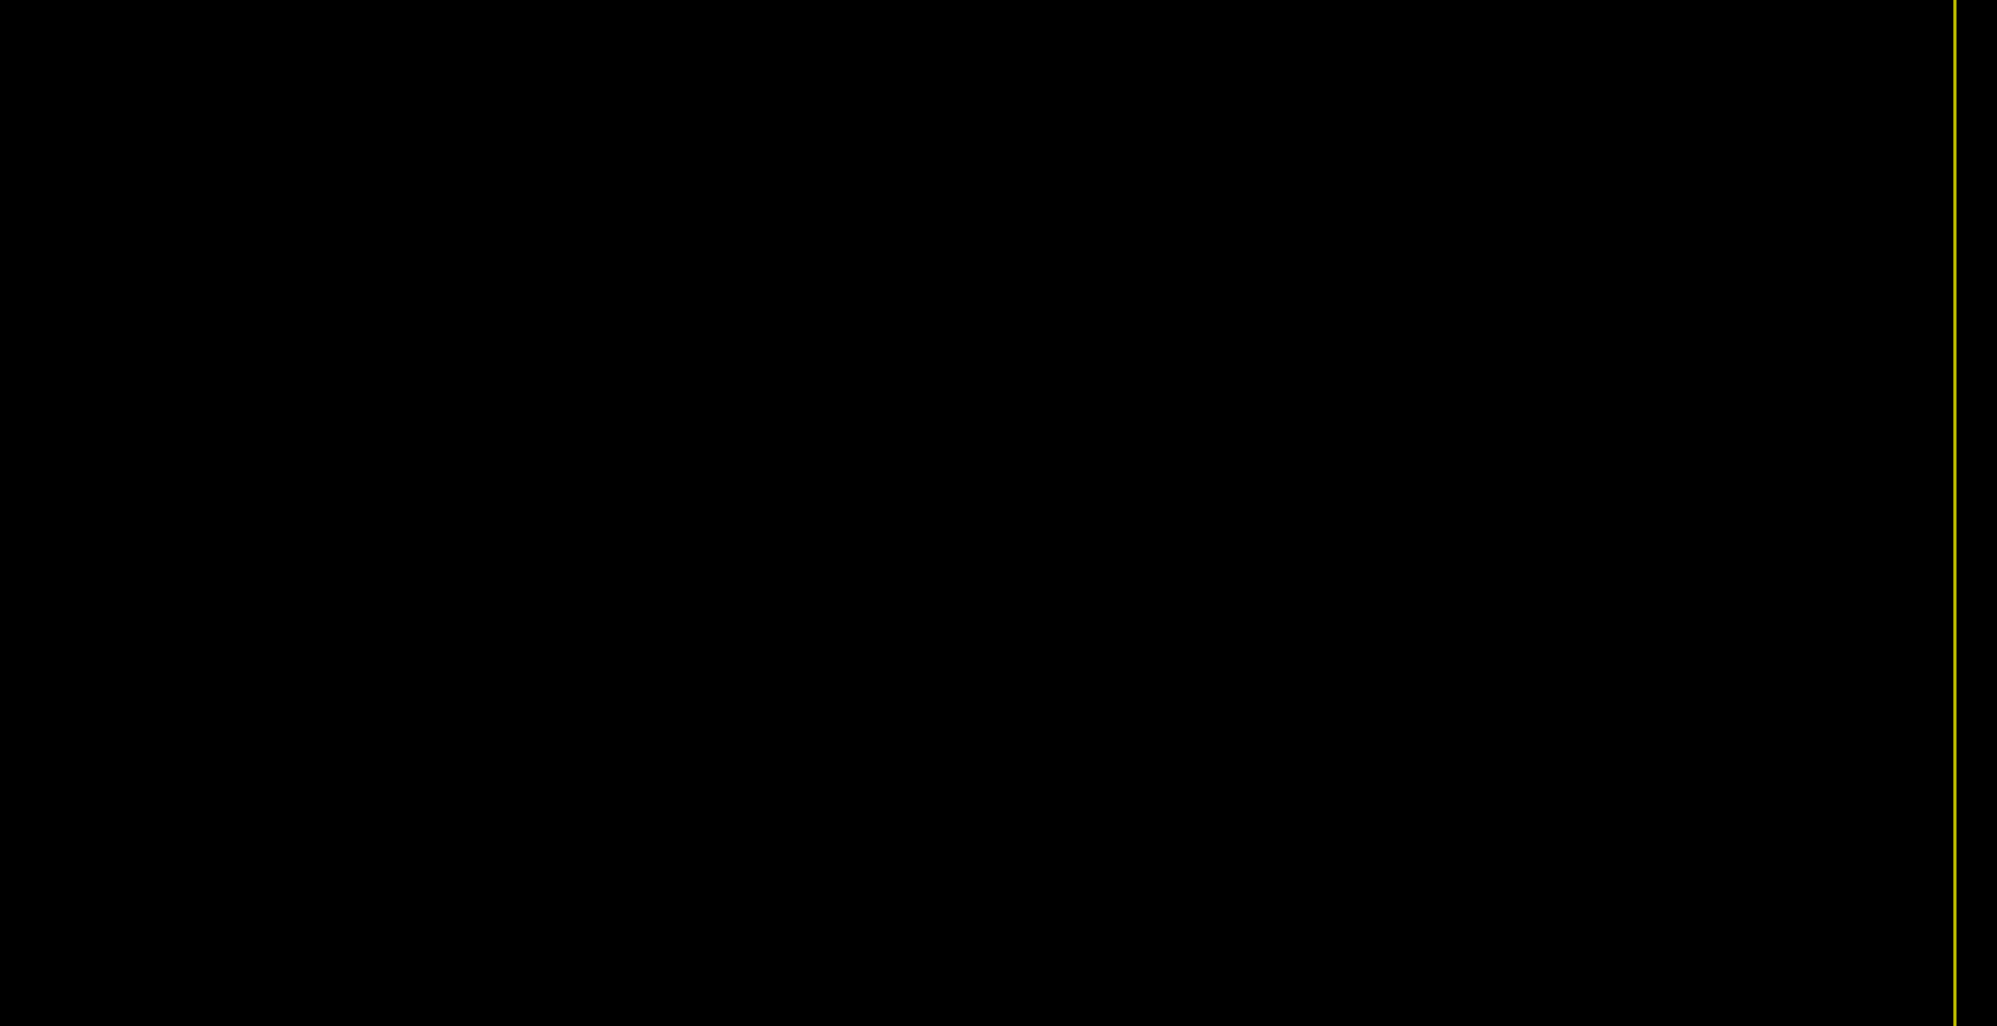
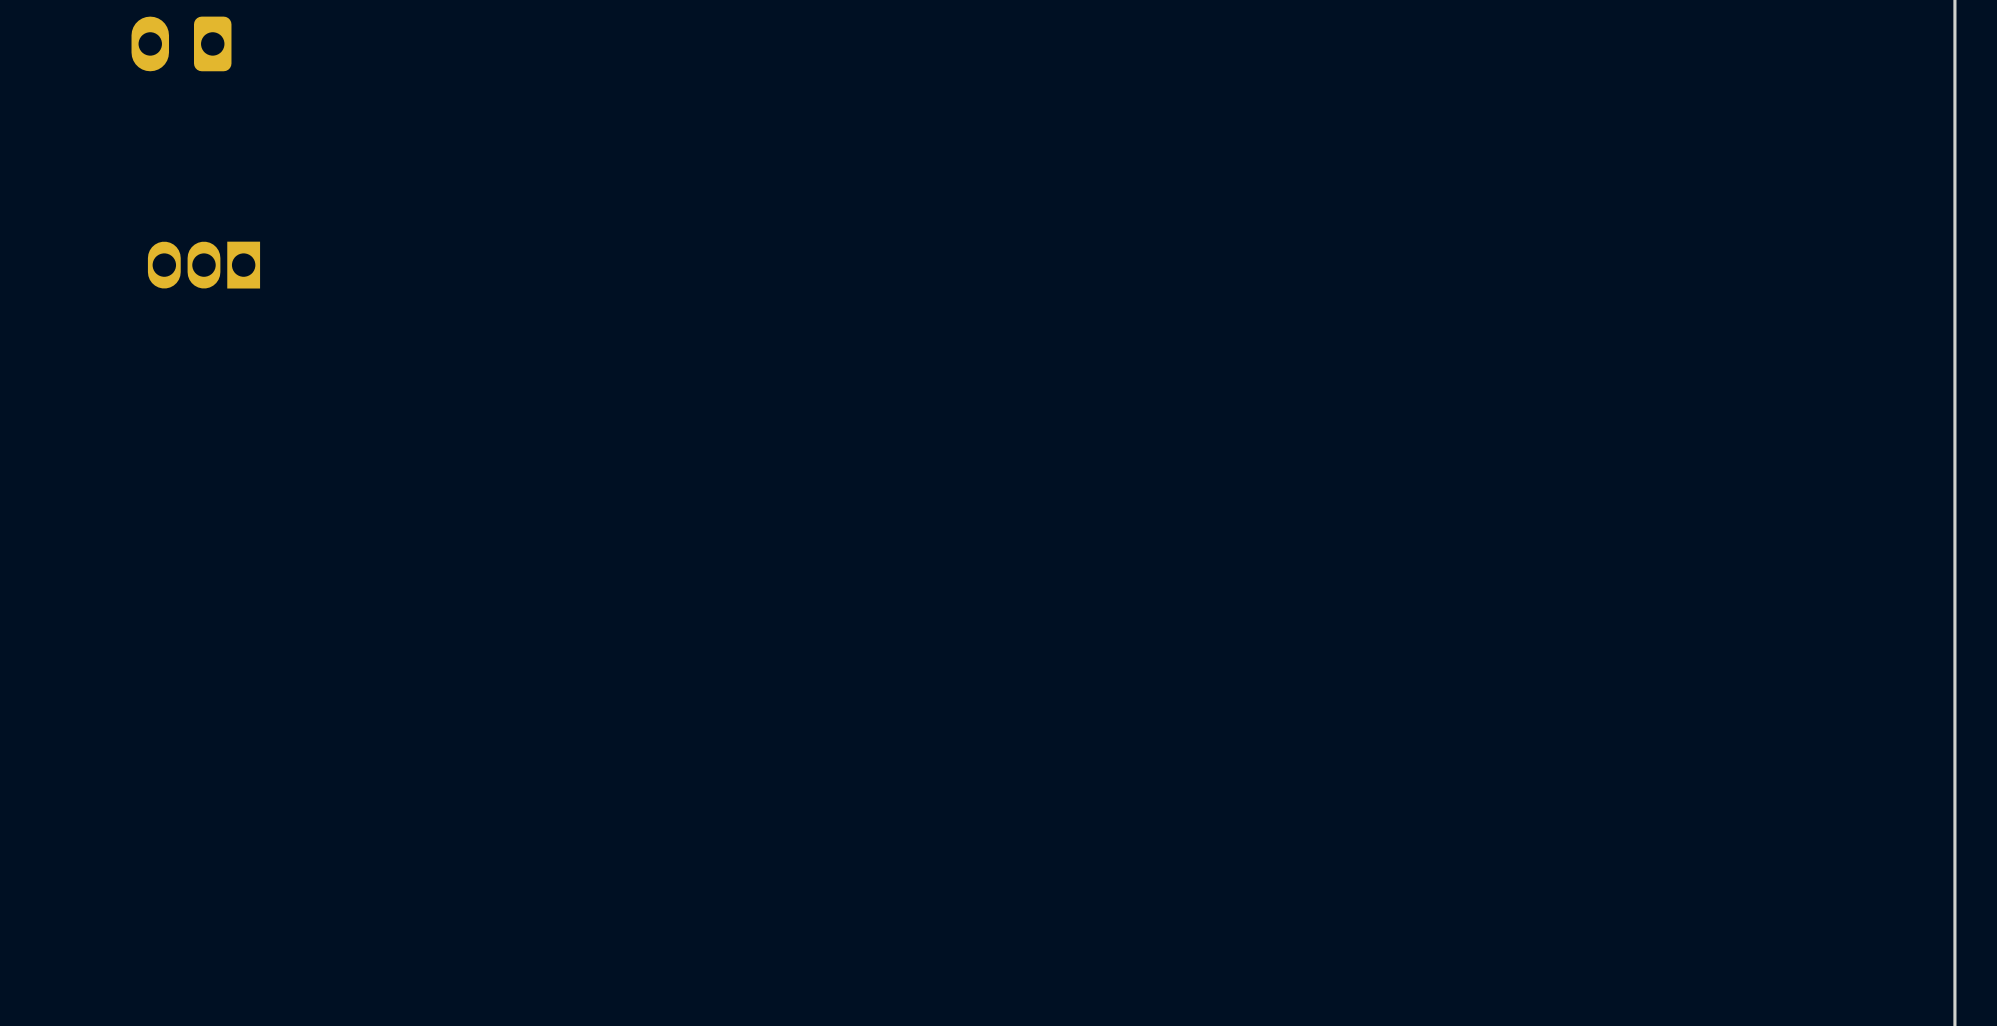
part: none -> (181, 43)
part: none -> (203, 265)

